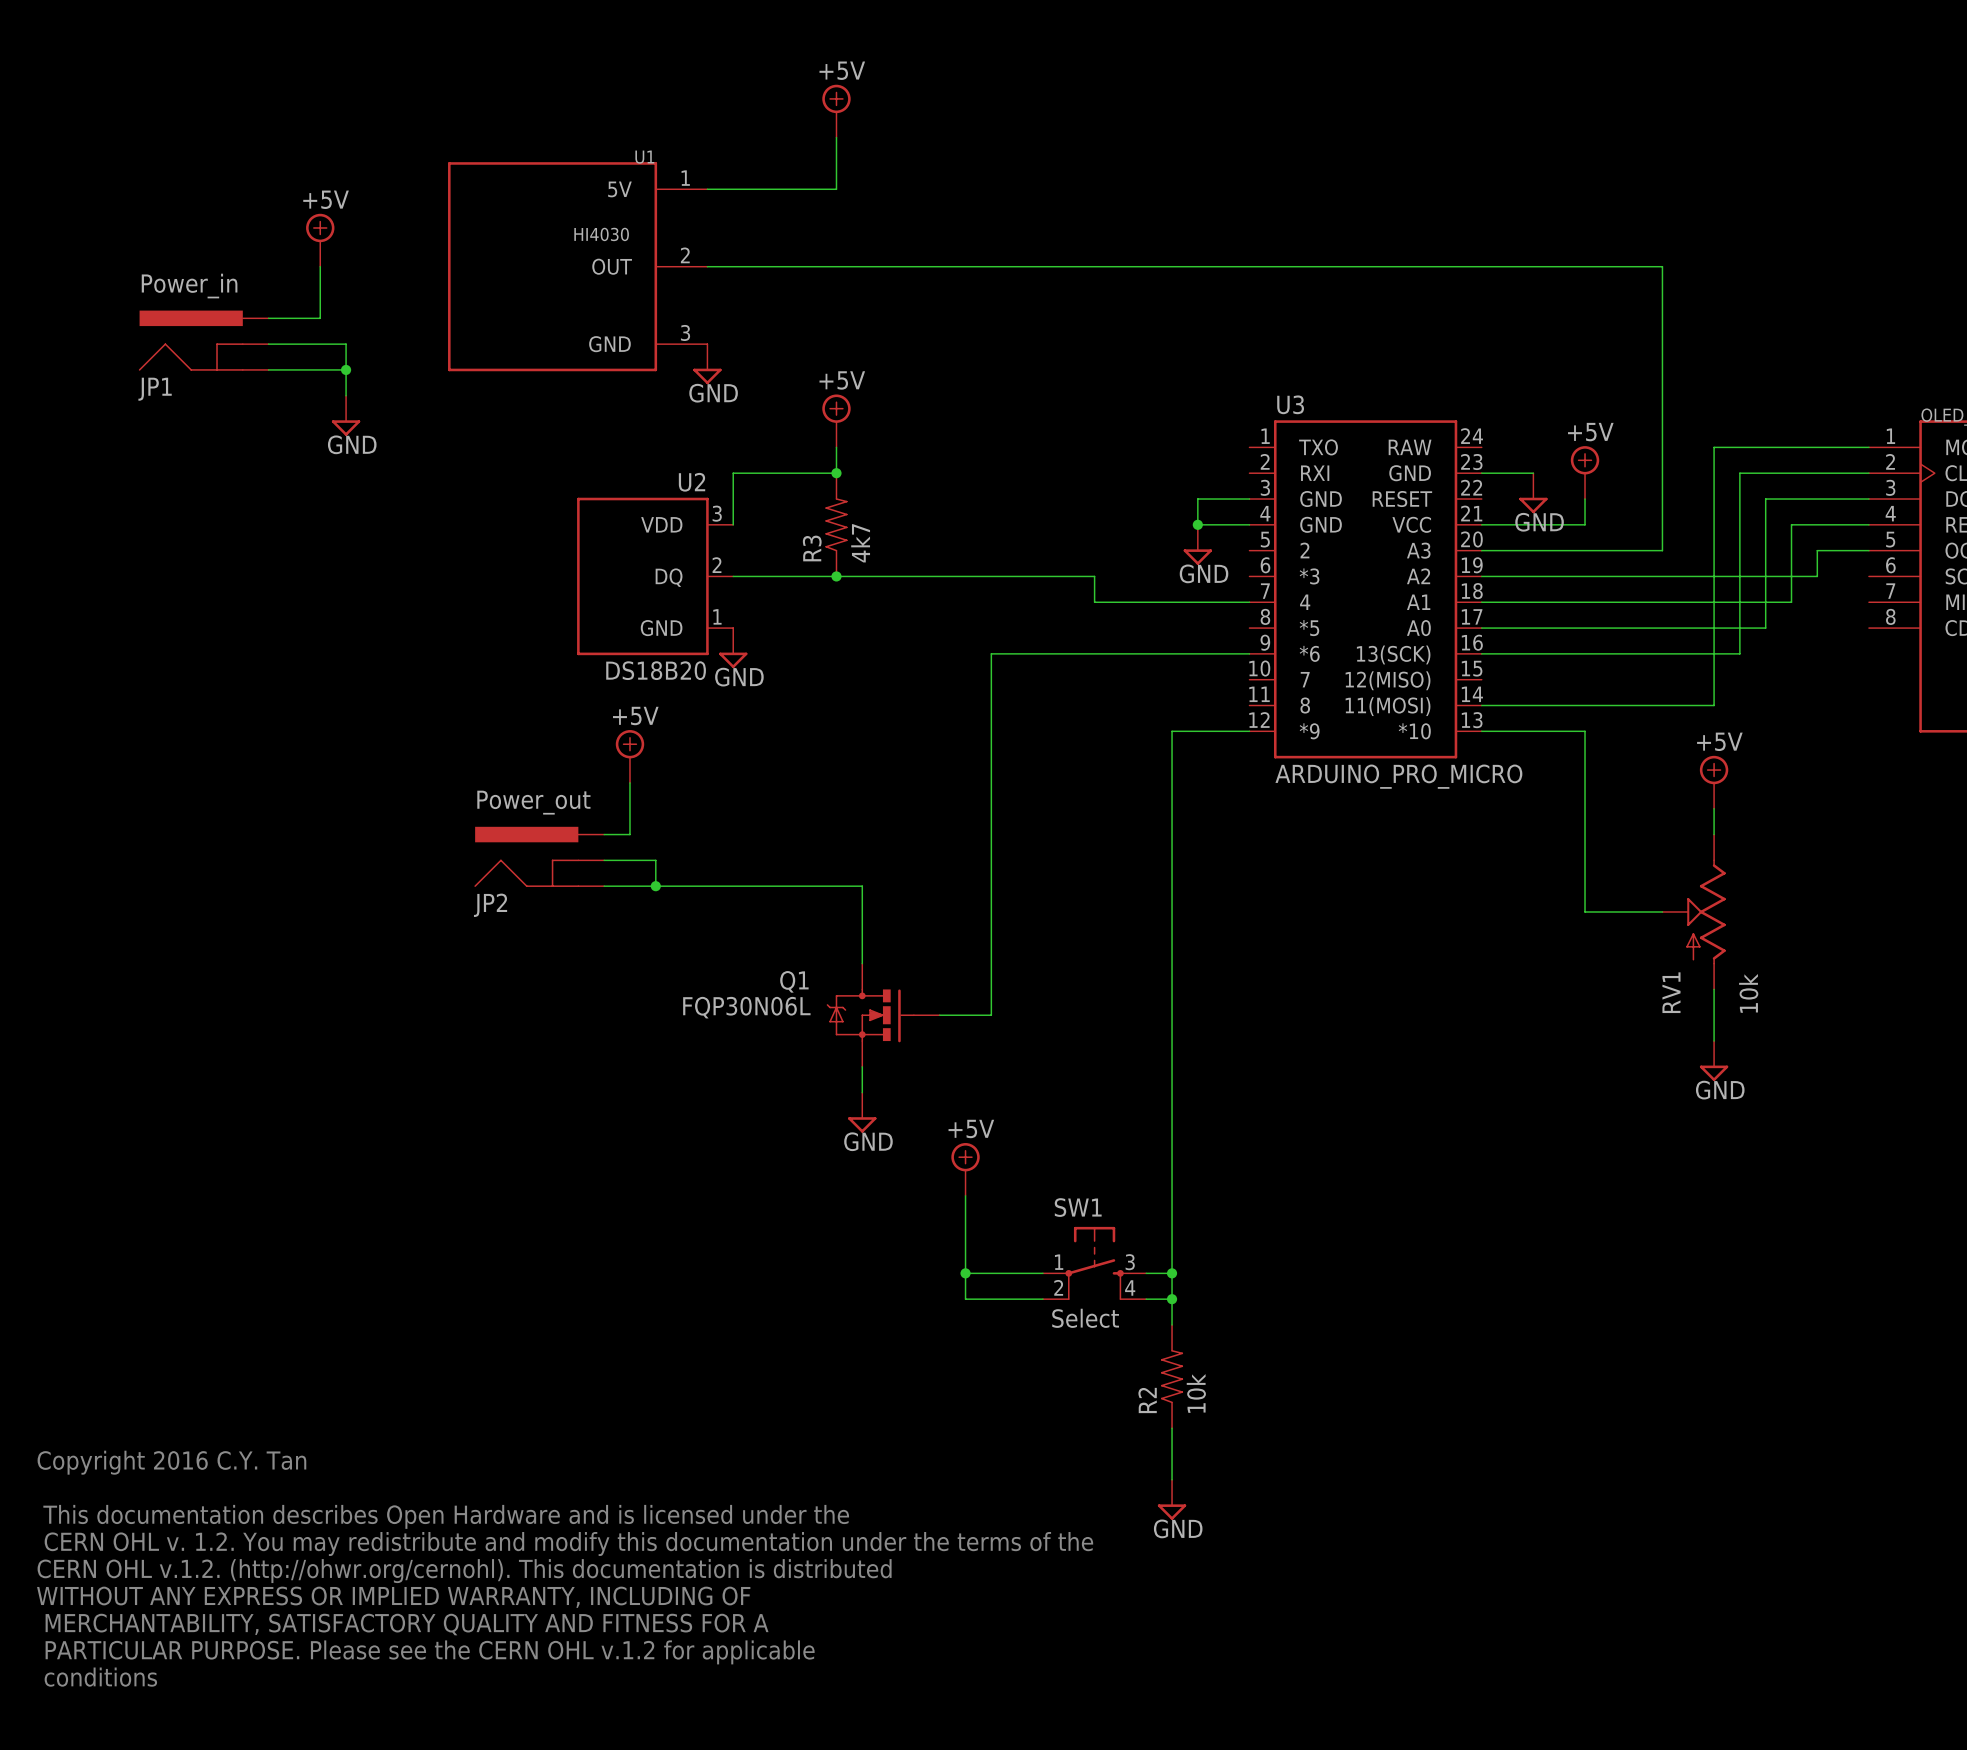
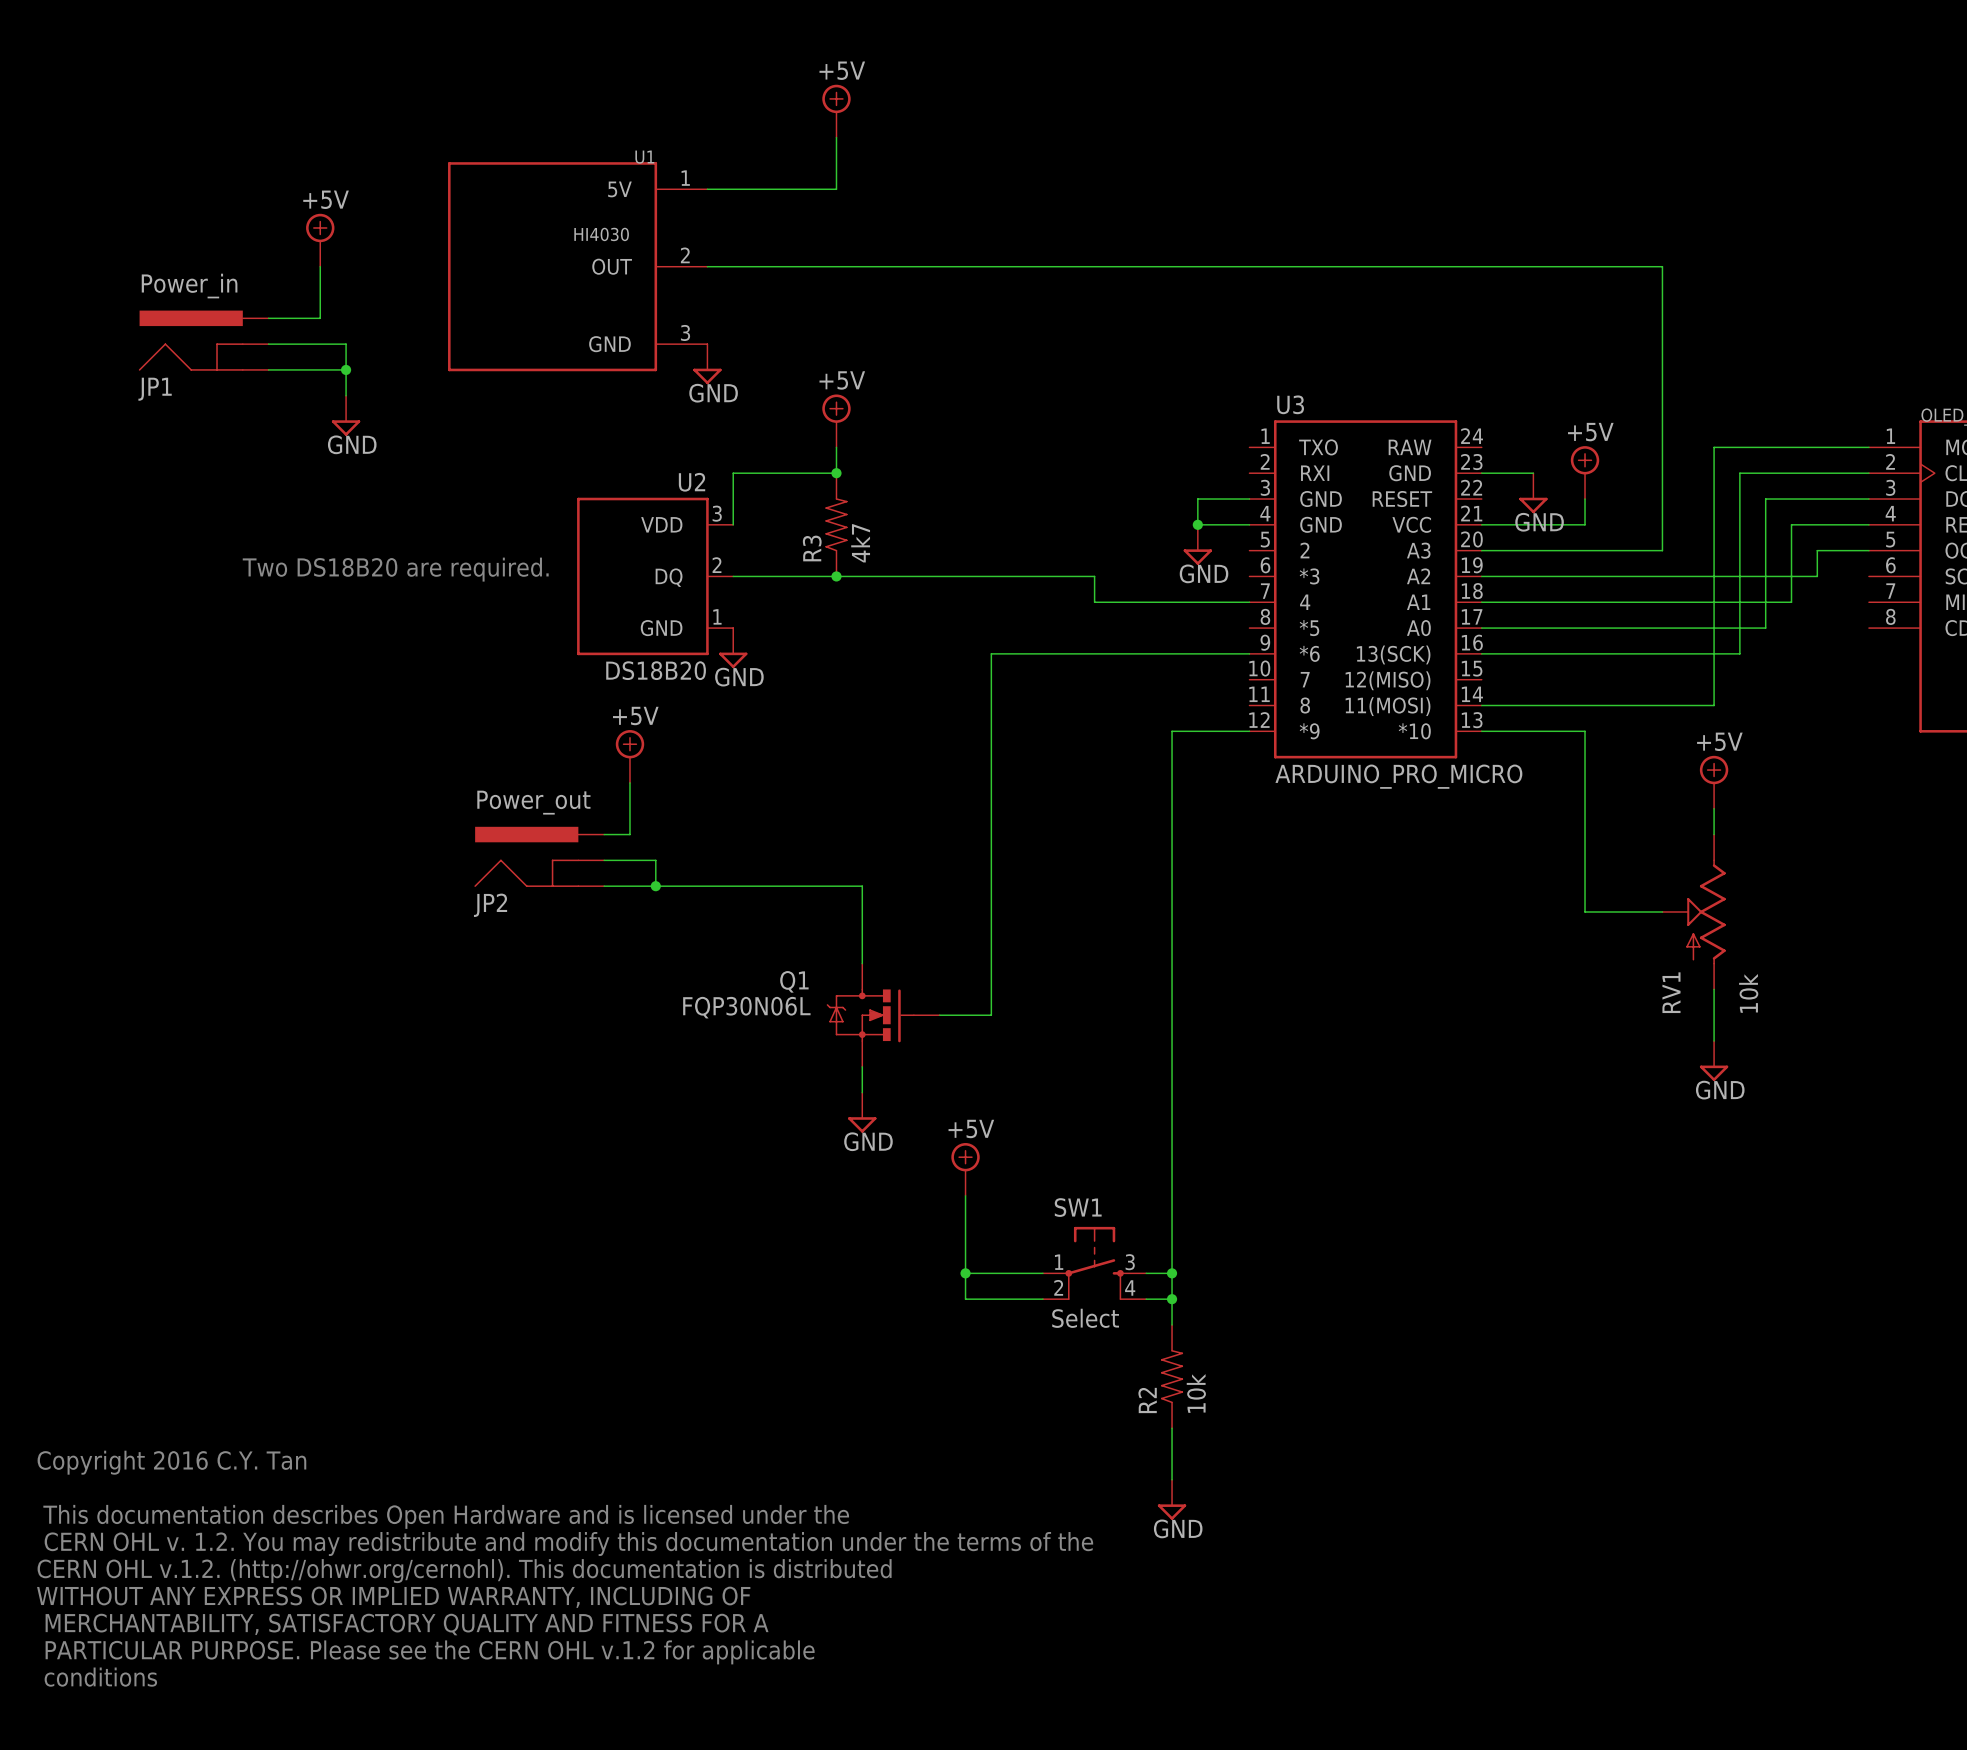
text: none -> Two DS18B20 are required. (395, 569)

